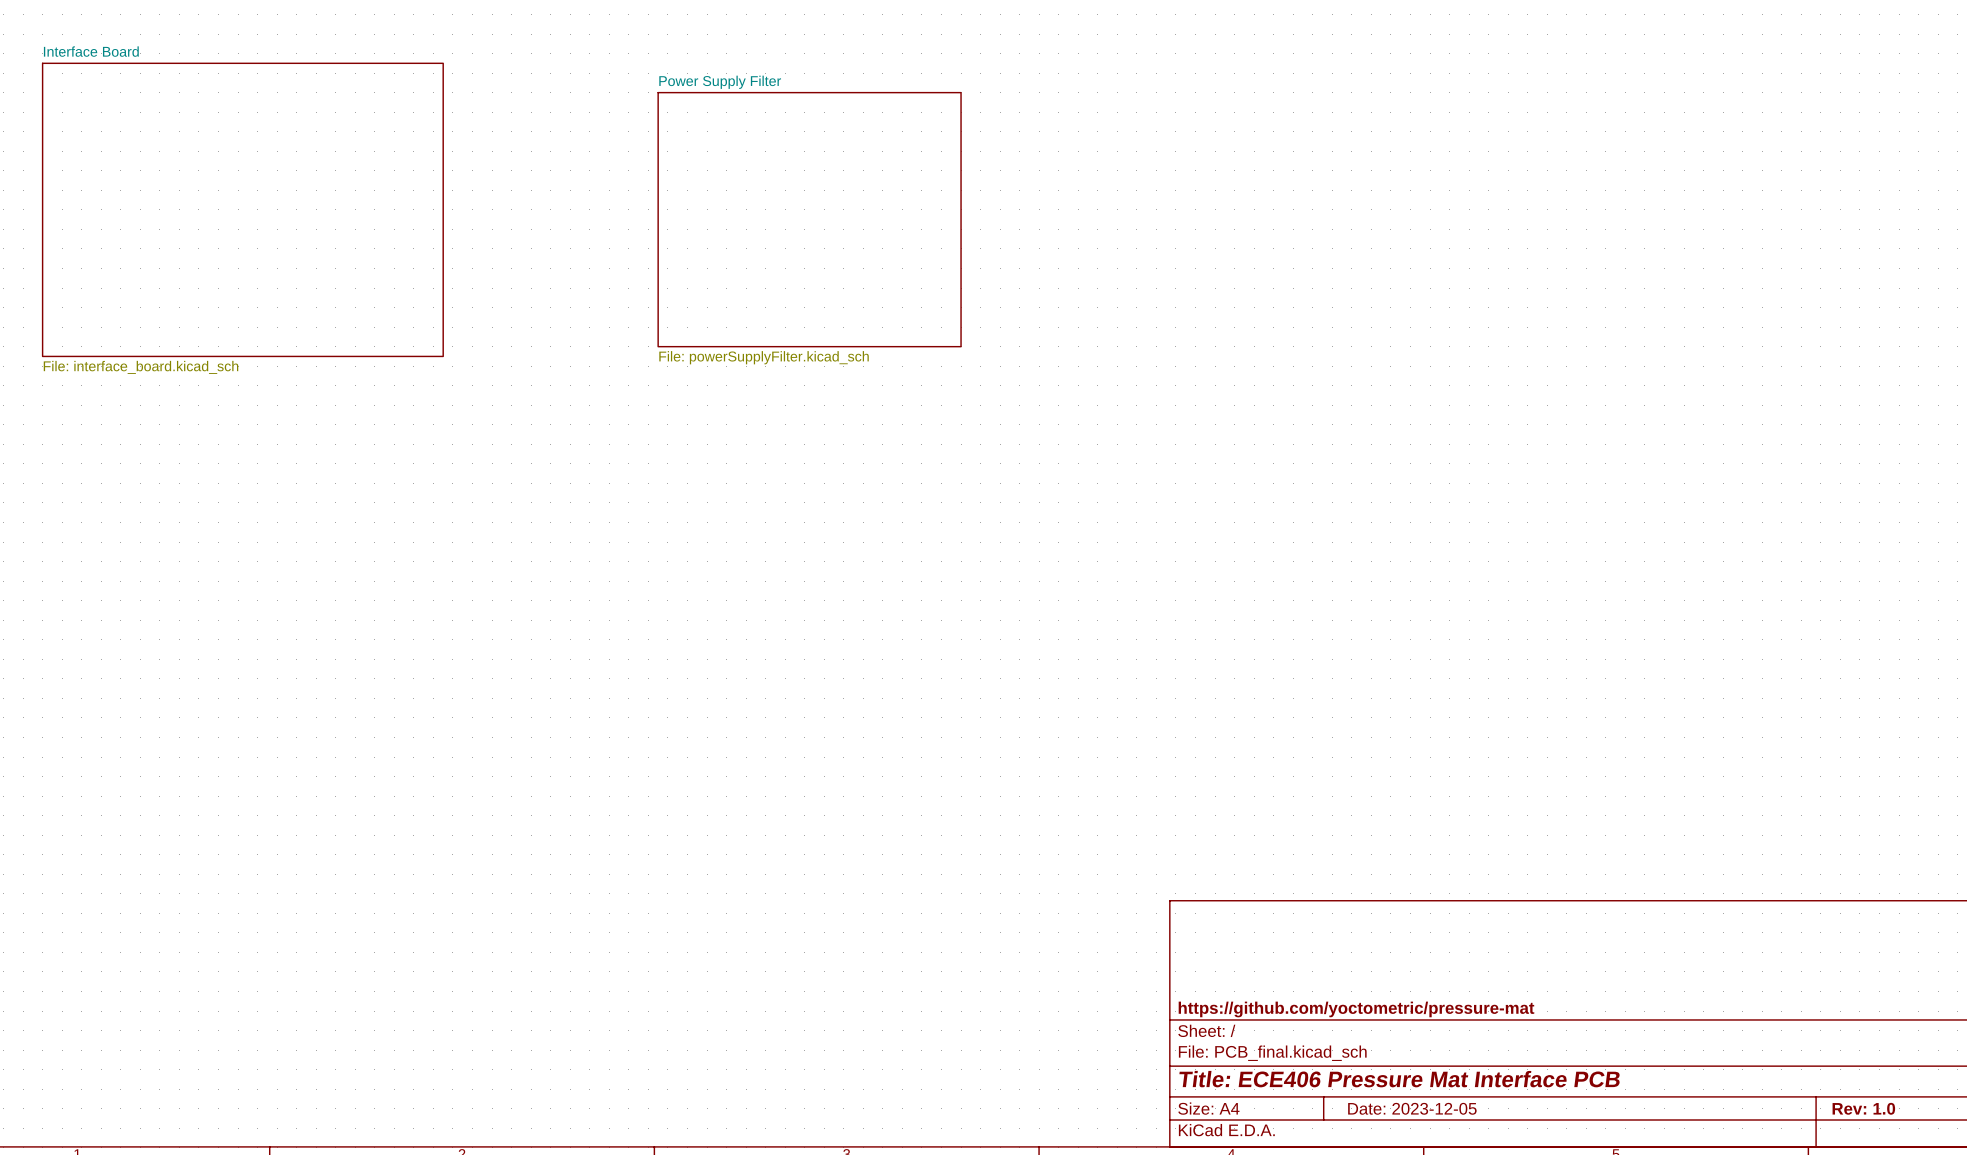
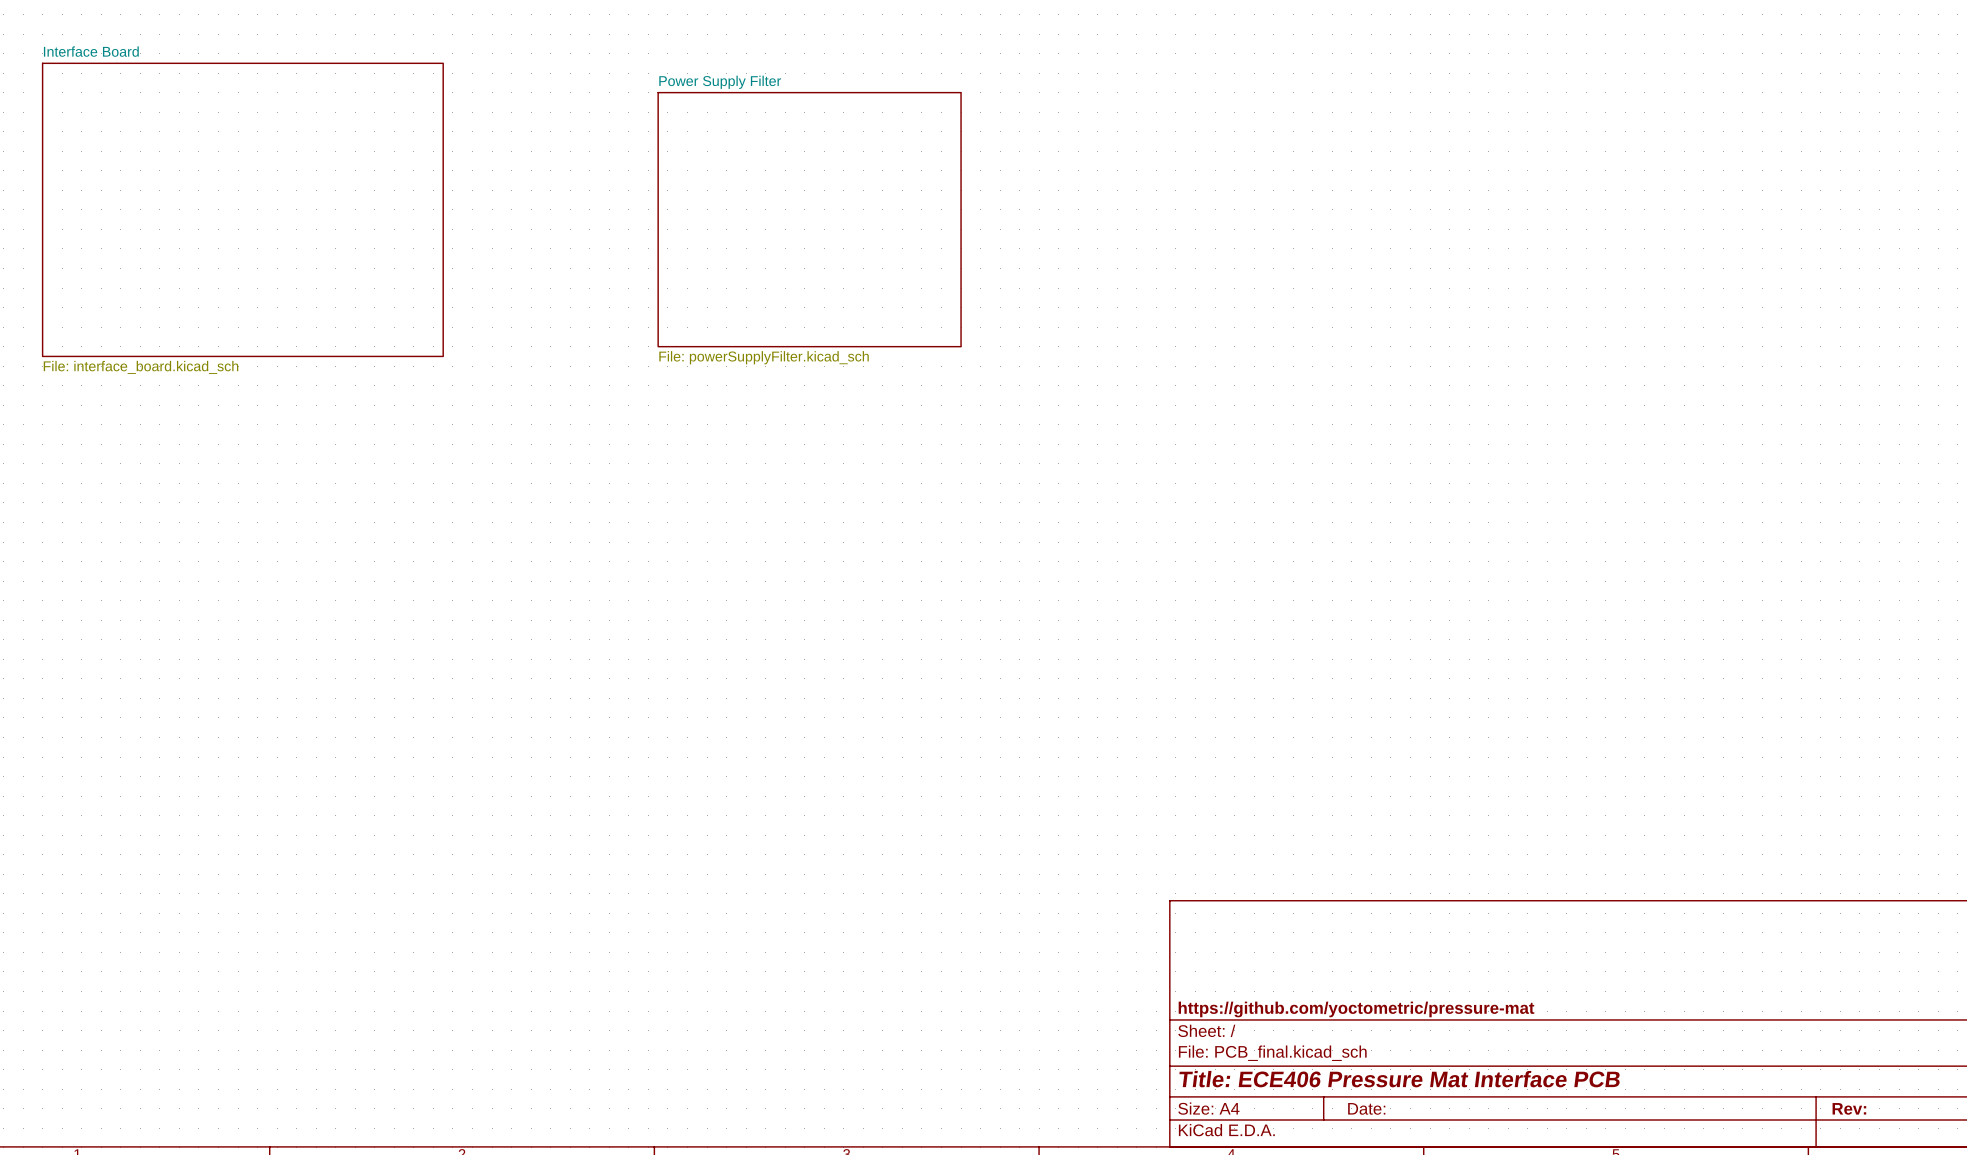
title block: Date: 2023-12-05 (1412, 1108) -> Date: (1366, 1108)
title block: Rev: 1.0 (1863, 1108) -> Rev: (1849, 1108)

